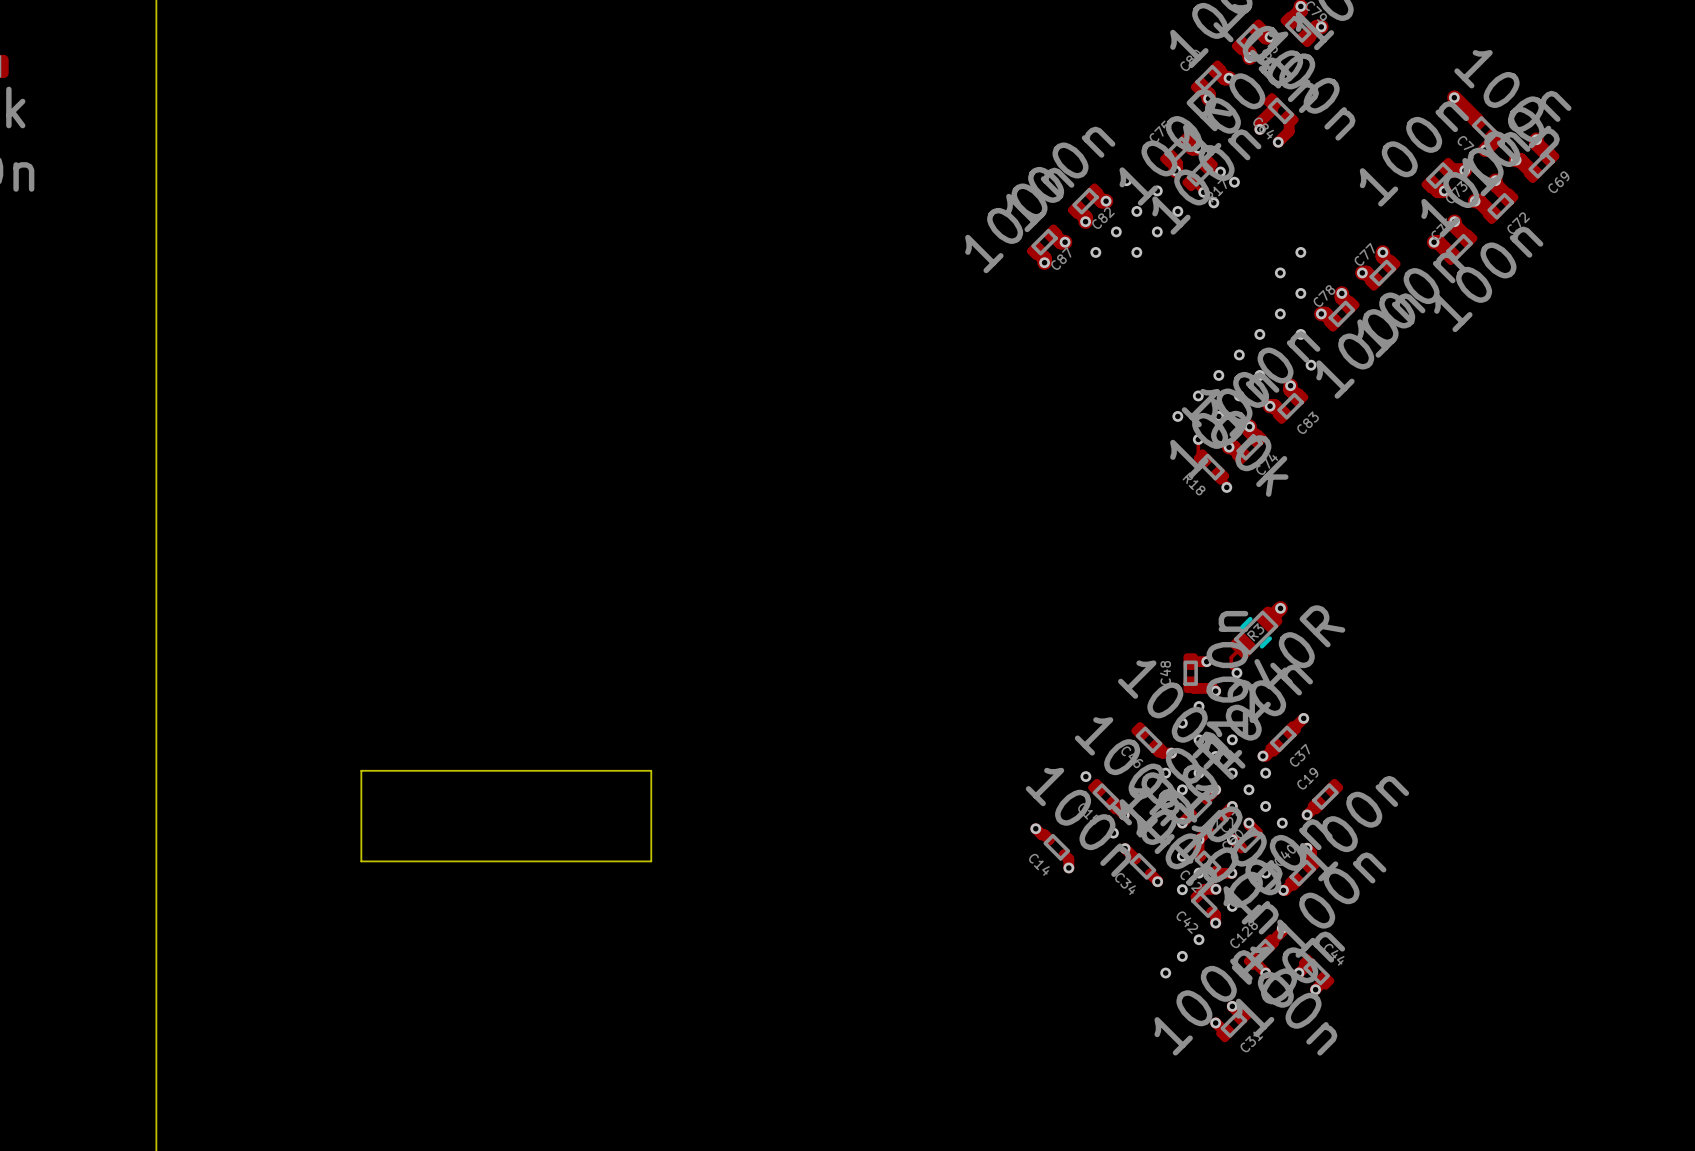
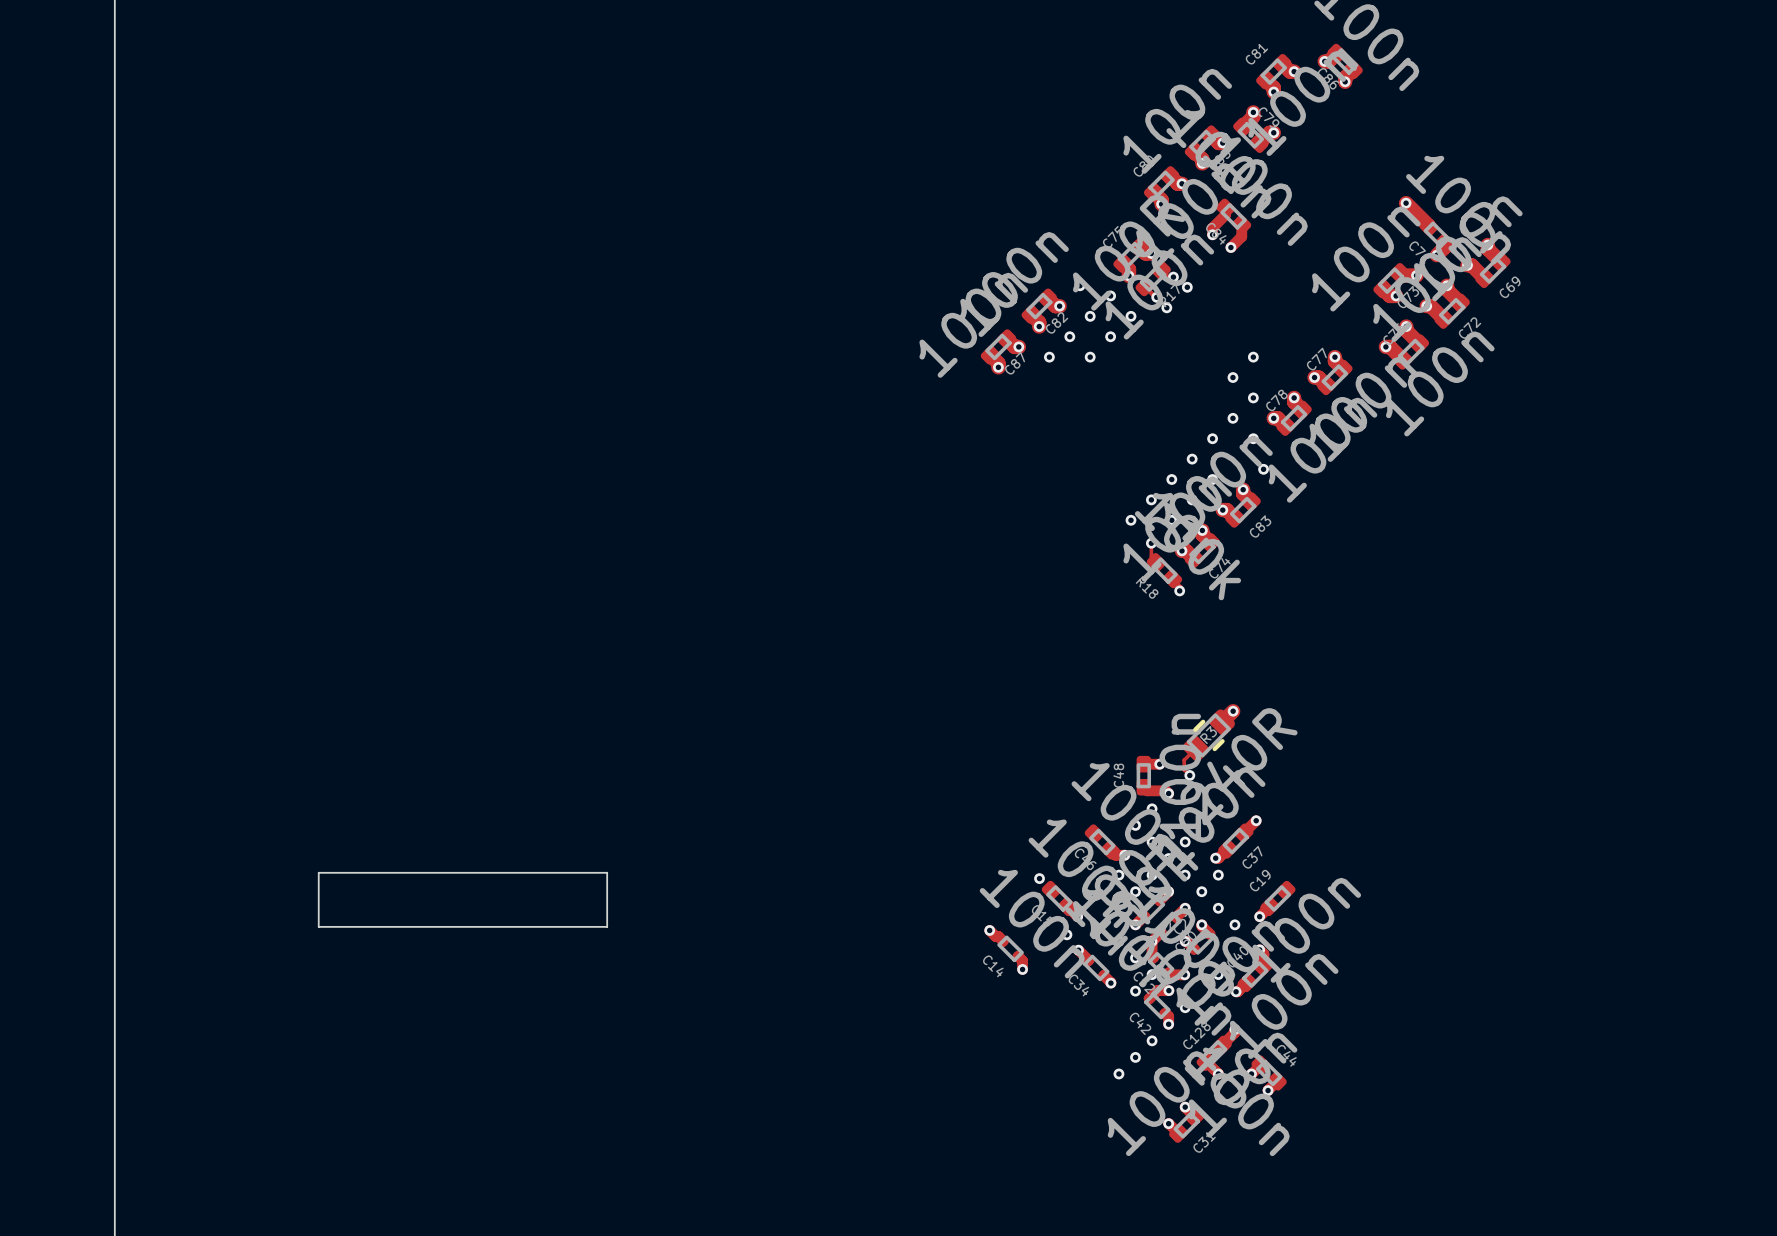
board edge: (361, 825) (361, 861) (651, 861) (651, 825) -> (318, 926) (607, 926)

